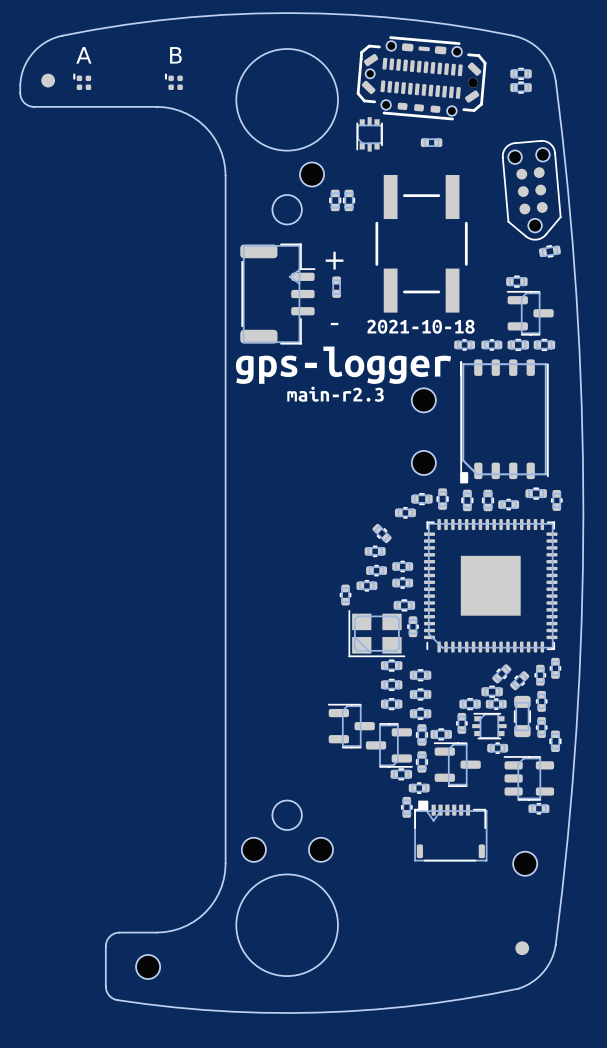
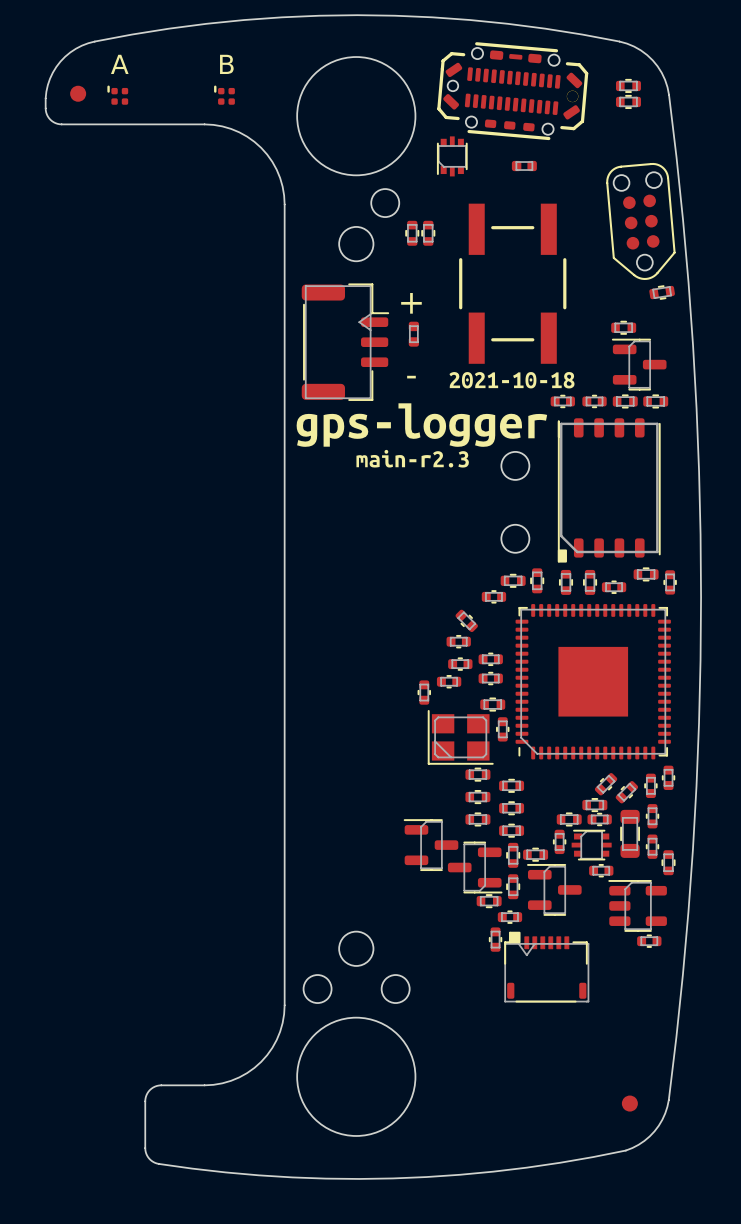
part: (525, 863) -> none
part: (148, 966) -> none

